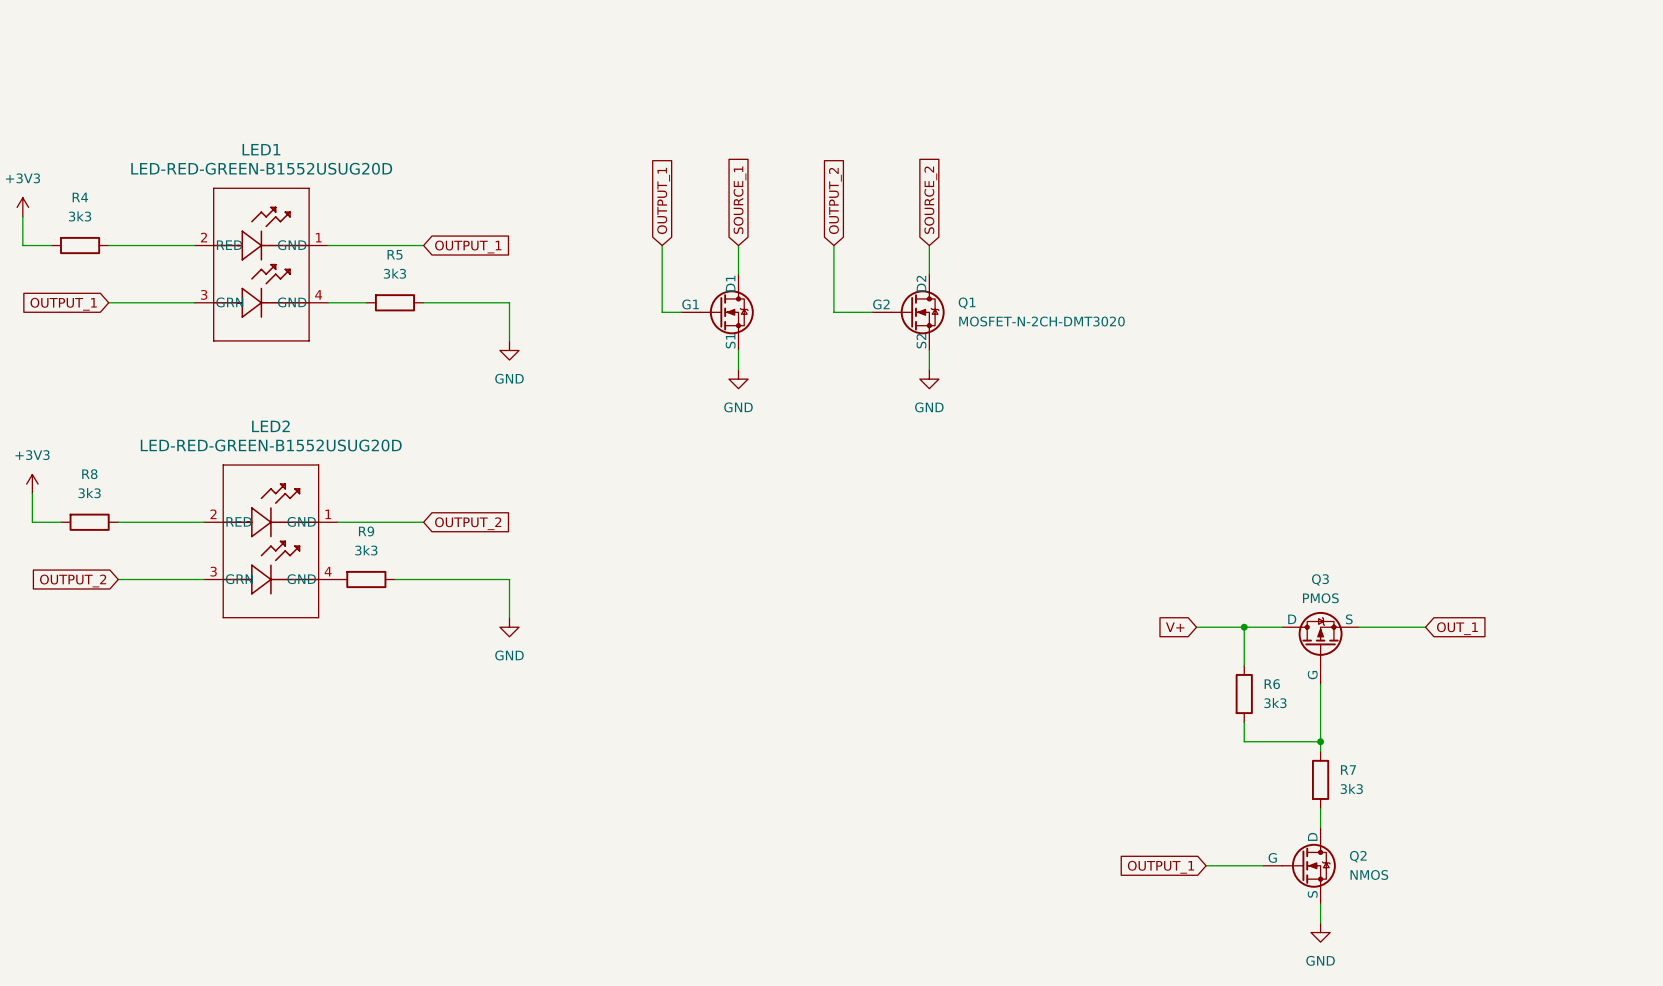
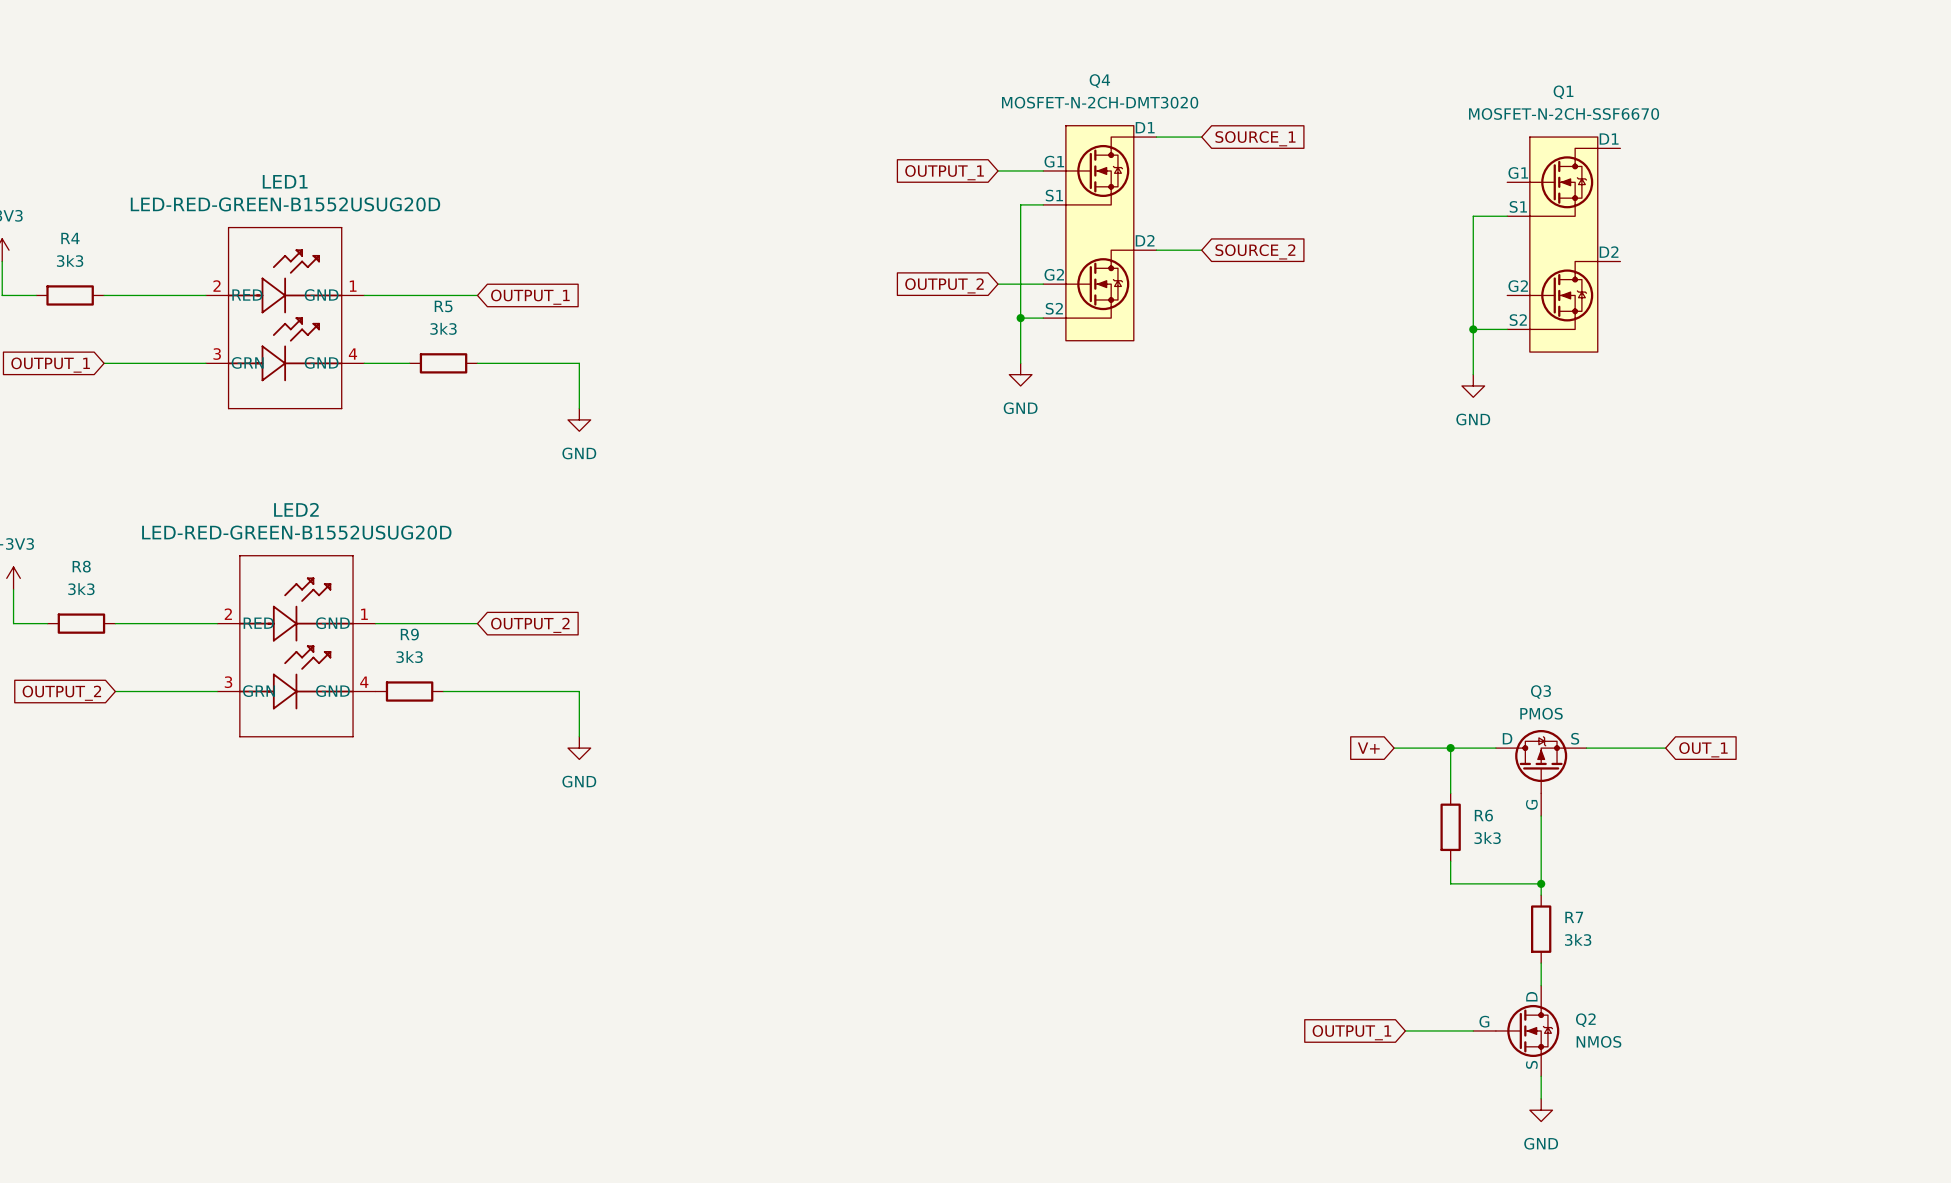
wire: none -> (1156, 137) (1201, 137)
global label: none -> SOURCE_1 (1255, 138)
wire: none -> (998, 170) (1043, 170)
global label: none -> OUTPUT_1 (944, 172)
wire: none -> (1043, 204) (1020, 204) (1020, 363)
wire: none -> (1507, 216) (1473, 216) (1473, 374)
Q4: none -> MOSFET-N-2CH-DMT3020 (1099, 233)
global label: OUTPUT_1 (663, 200) -> none
global label: SOURCE_1 (739, 200) -> none
global label rotation: 0° (835, 200) -> 90° counterclockwise (944, 285)
global label rotation: 0° (930, 200) -> 90° clockwise (1255, 251)
global label position: SOURCE_2 (930, 200) -> SOURCE_2 (1255, 251)
wire: none -> (1156, 250) (1201, 250)
wire: none -> (998, 284) (1043, 284)
wire: (662, 245) (662, 312) (681, 312) -> none
wire: (738, 245) (738, 274) -> none
wire: (833, 245) (833, 312) (872, 312) -> none
wire: none -> (1020, 318) (1043, 318)
junction: none -> (1020, 318)
Q1 symbol: [681, 274, 945, 351] -> [1507, 137, 1621, 353]
wire: none -> (1473, 329) (1507, 329)
junction: none -> (1473, 329)
Q1 name position: Q1 (967, 303) -> Q1 (1563, 92)
power symbol: none -> GND (1020, 374)
Q1 value: MOSFET-N-2CH-DMT3020 (1042, 321) -> MOSFET-N-2CH-SSF6670 (1564, 113)
power symbol: none -> GND (1473, 385)
wire: (738, 350) (738, 369) -> none
wire: (929, 350) (929, 369) -> none
power symbol: GND (738, 379) -> none
power symbol: GND (929, 379) -> none

